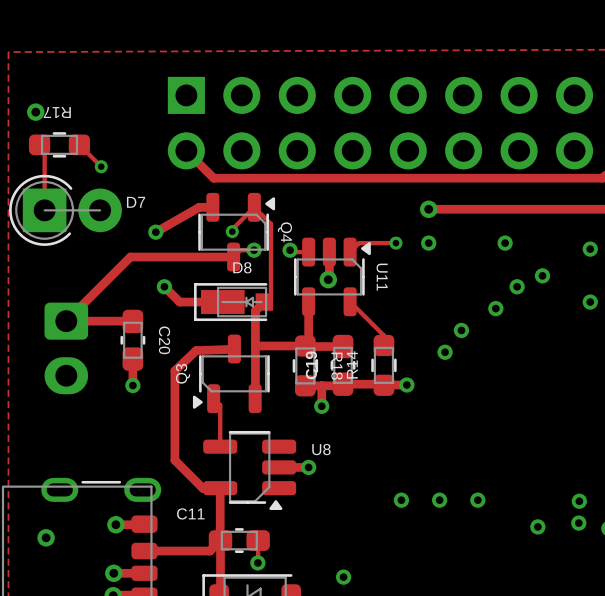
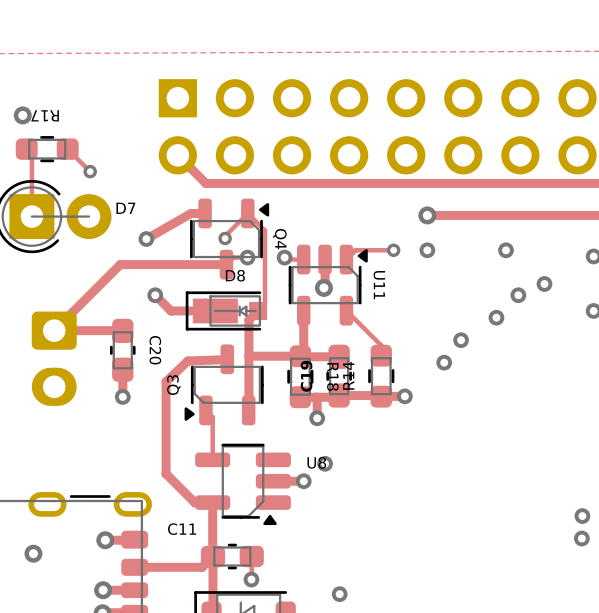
via: none -> (325, 463)
via: (401, 500) -> none
via: (439, 500) -> none
via: (477, 500) -> none
via: (537, 526) -> none

